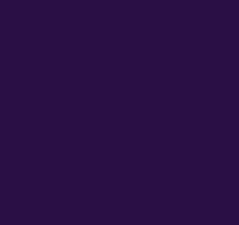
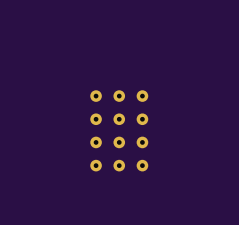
part: none -> (119, 130)

